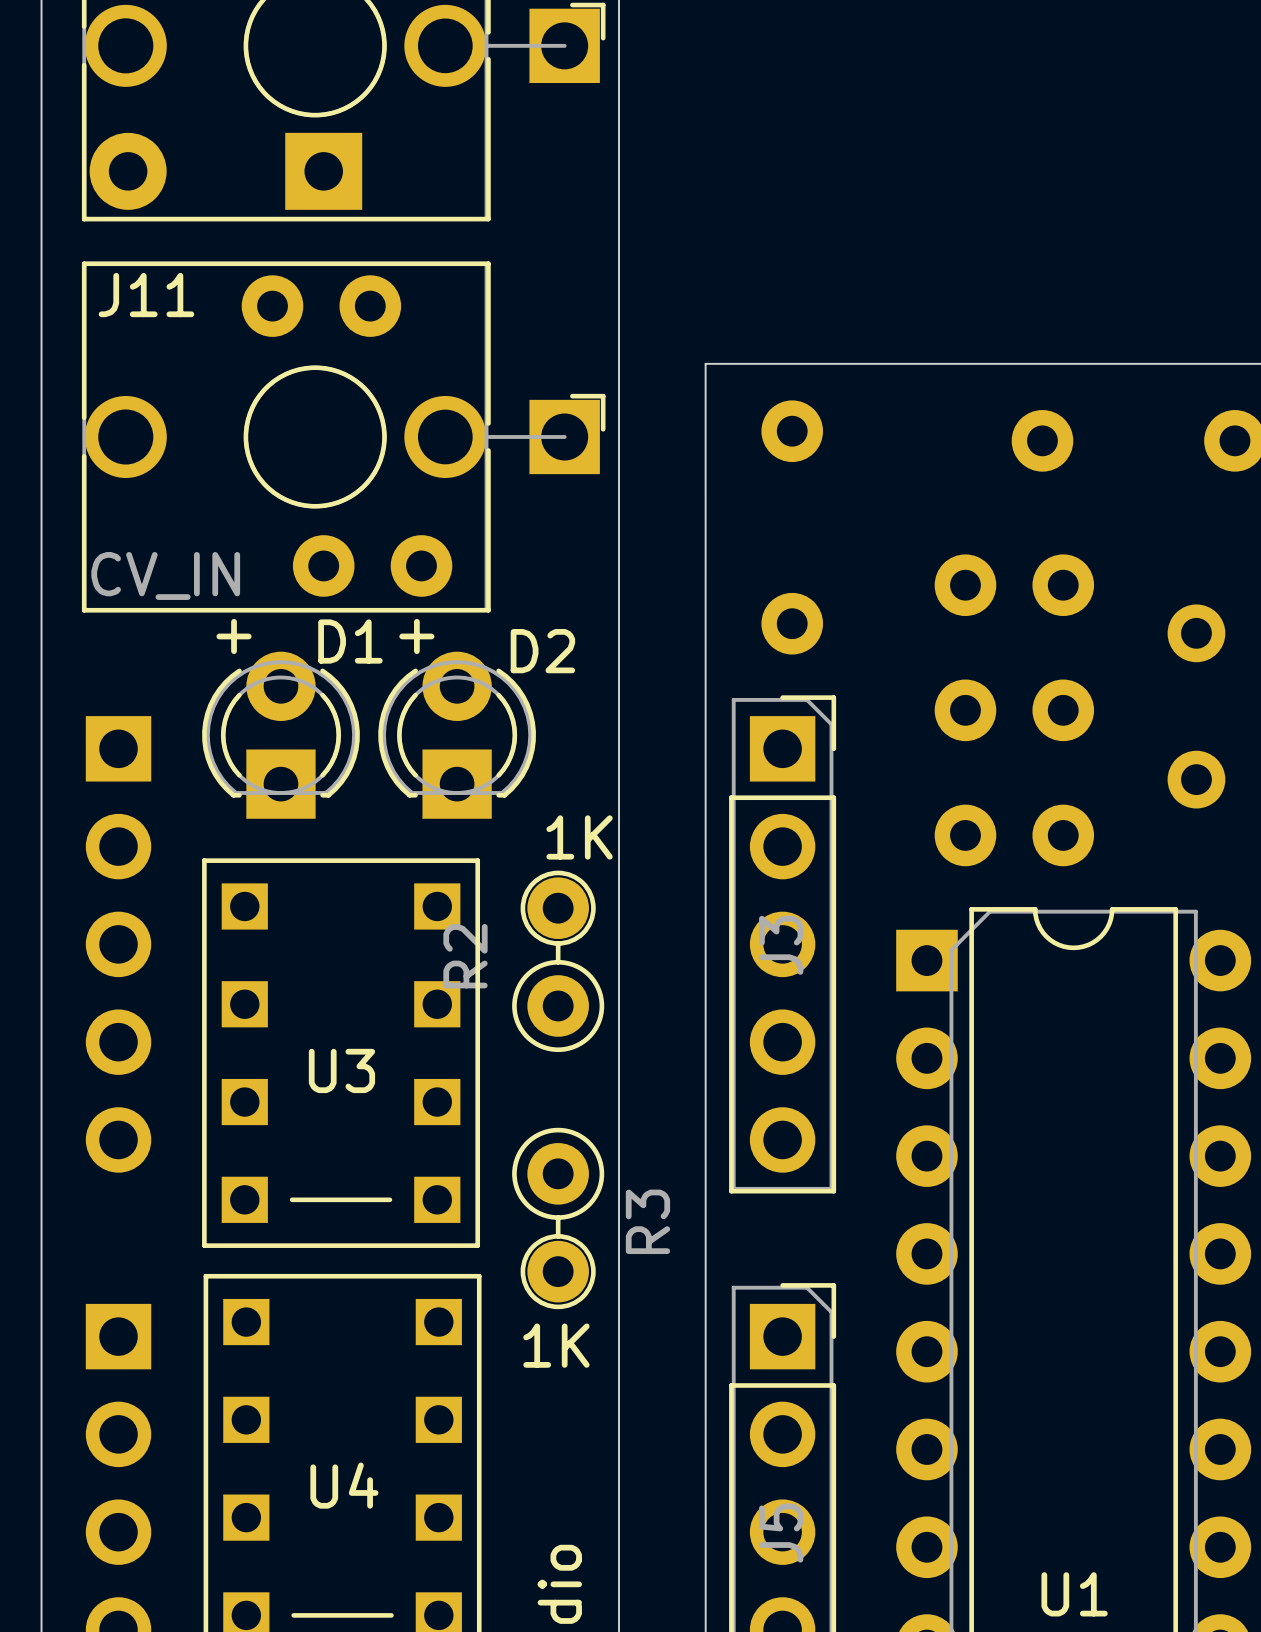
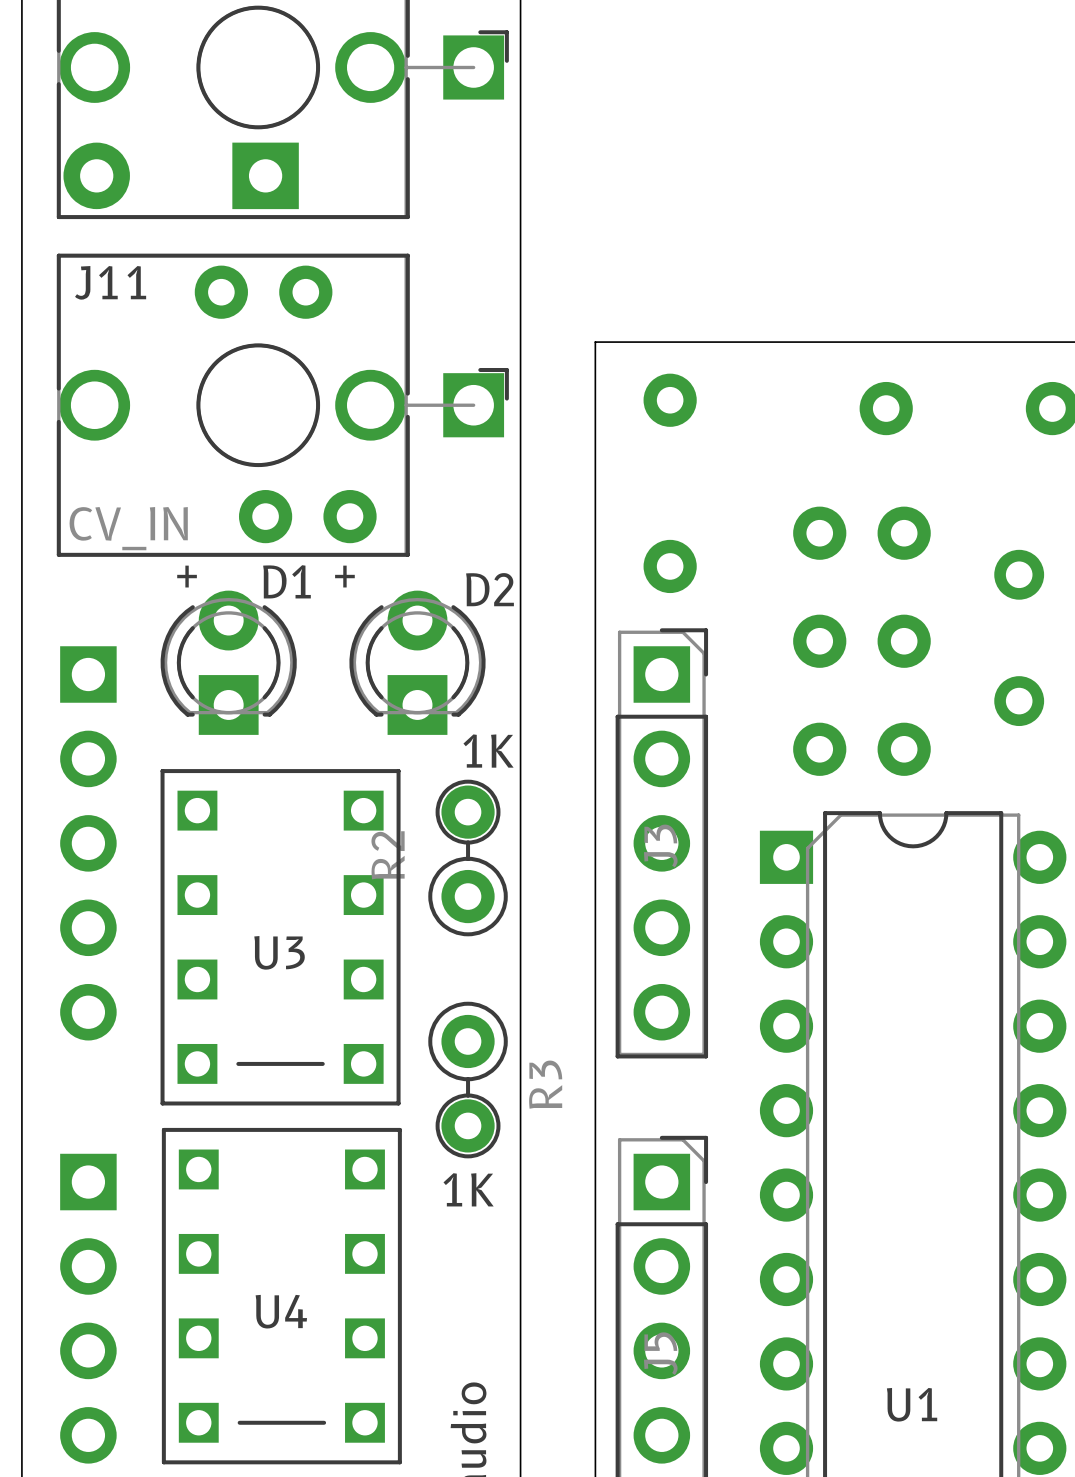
D2 position: (457, 735) -> (417, 662)

